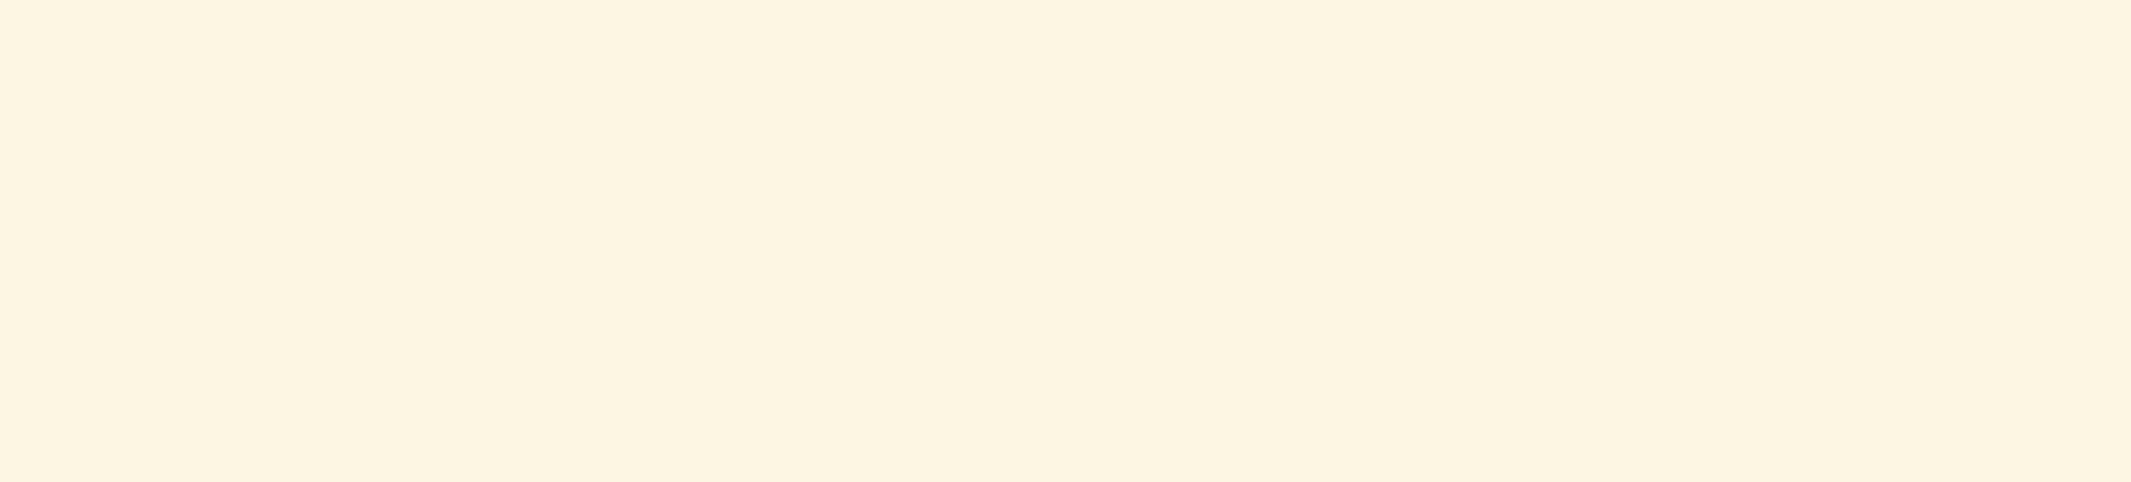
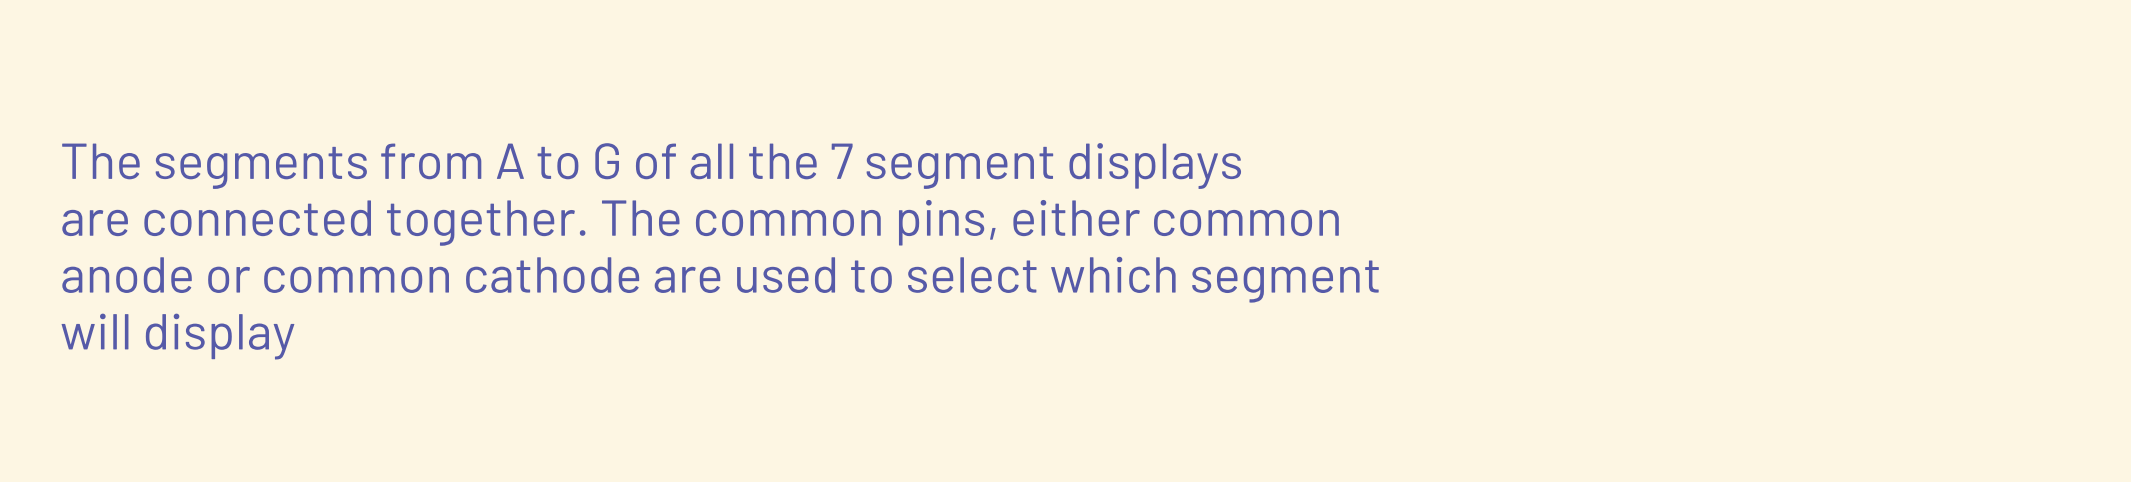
text: none -> The segments from A to G of all the 7 segment displays (651, 166)
text: none -> are connected together. The common pins, either common (700, 222)
text: none -> anode or common cathode are used to select which segment (720, 279)
text: none -> will display (178, 336)

